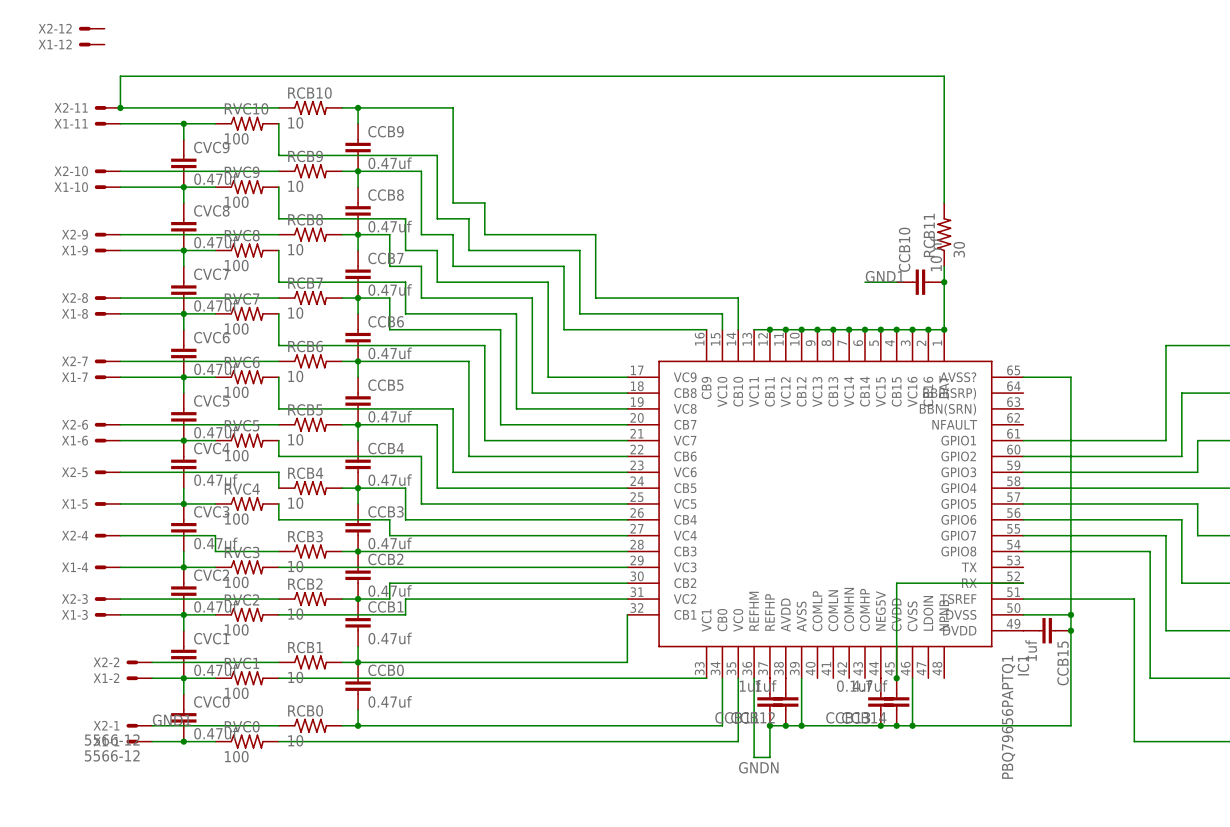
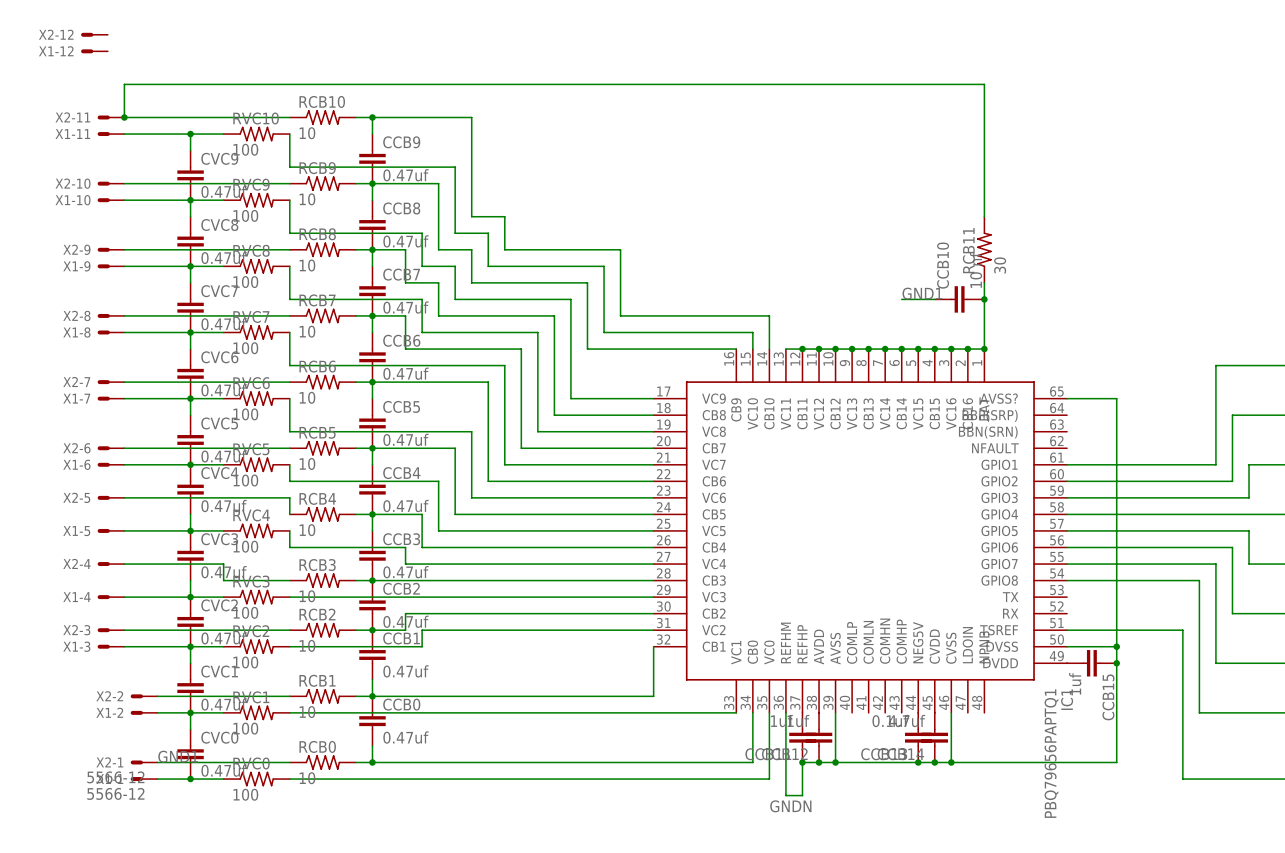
wire: (1023, 583) (896, 583) (896, 678) -> none
junction: (896, 678) -> none

